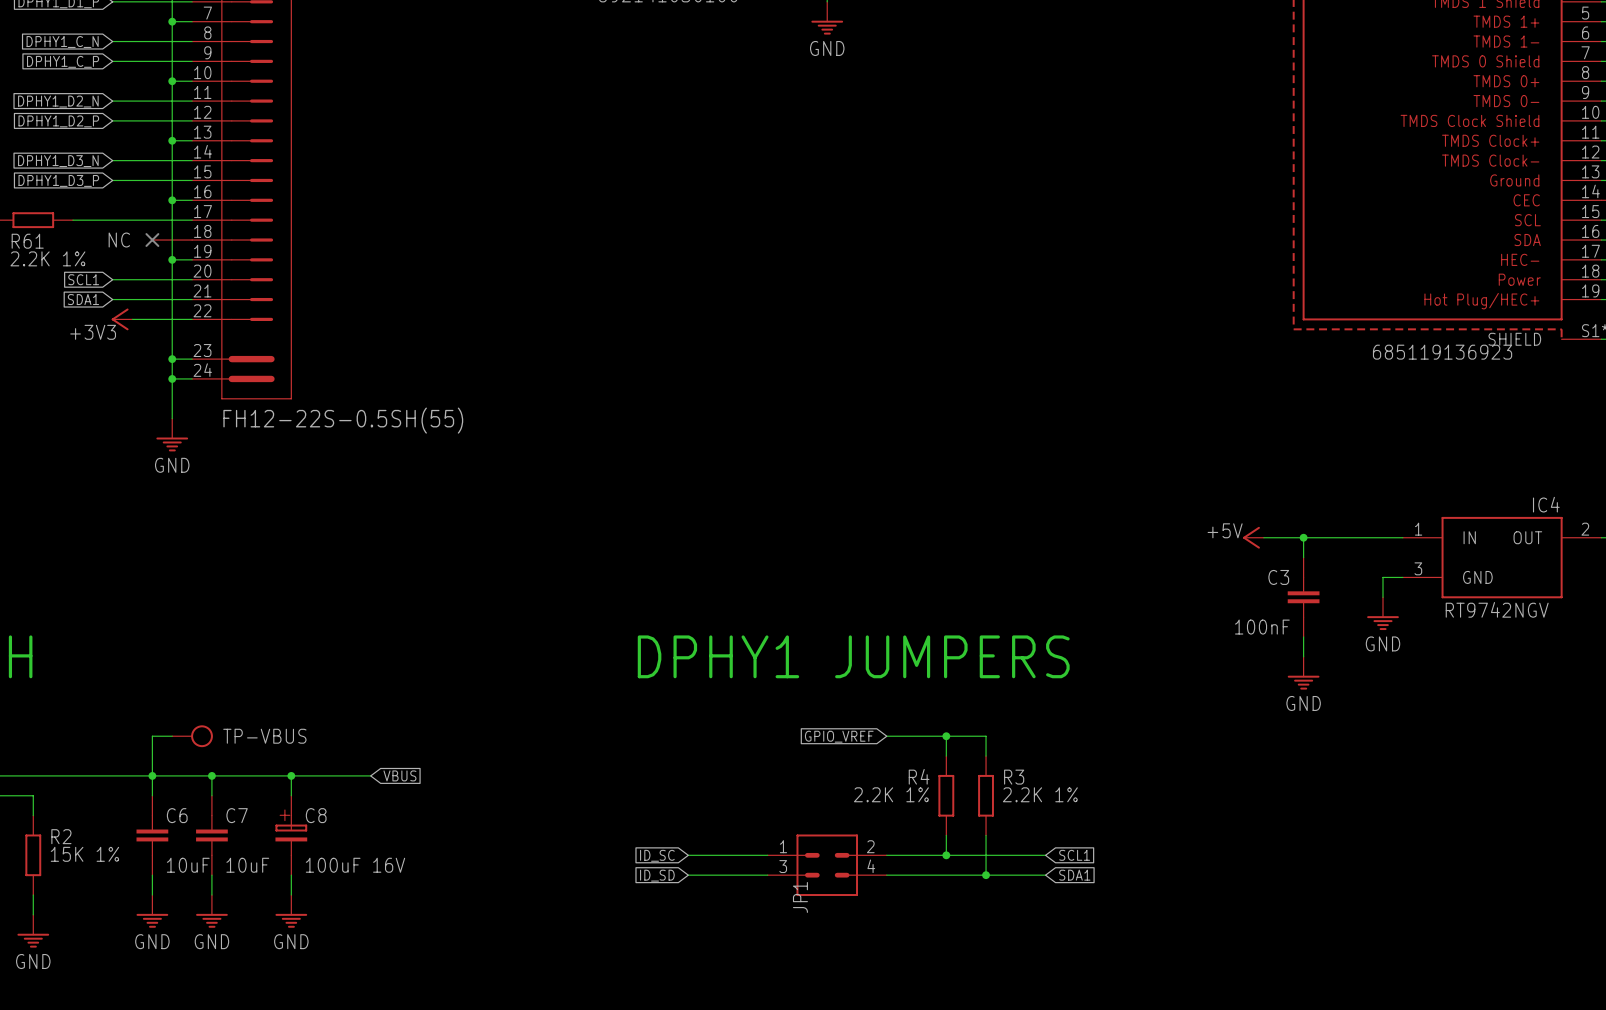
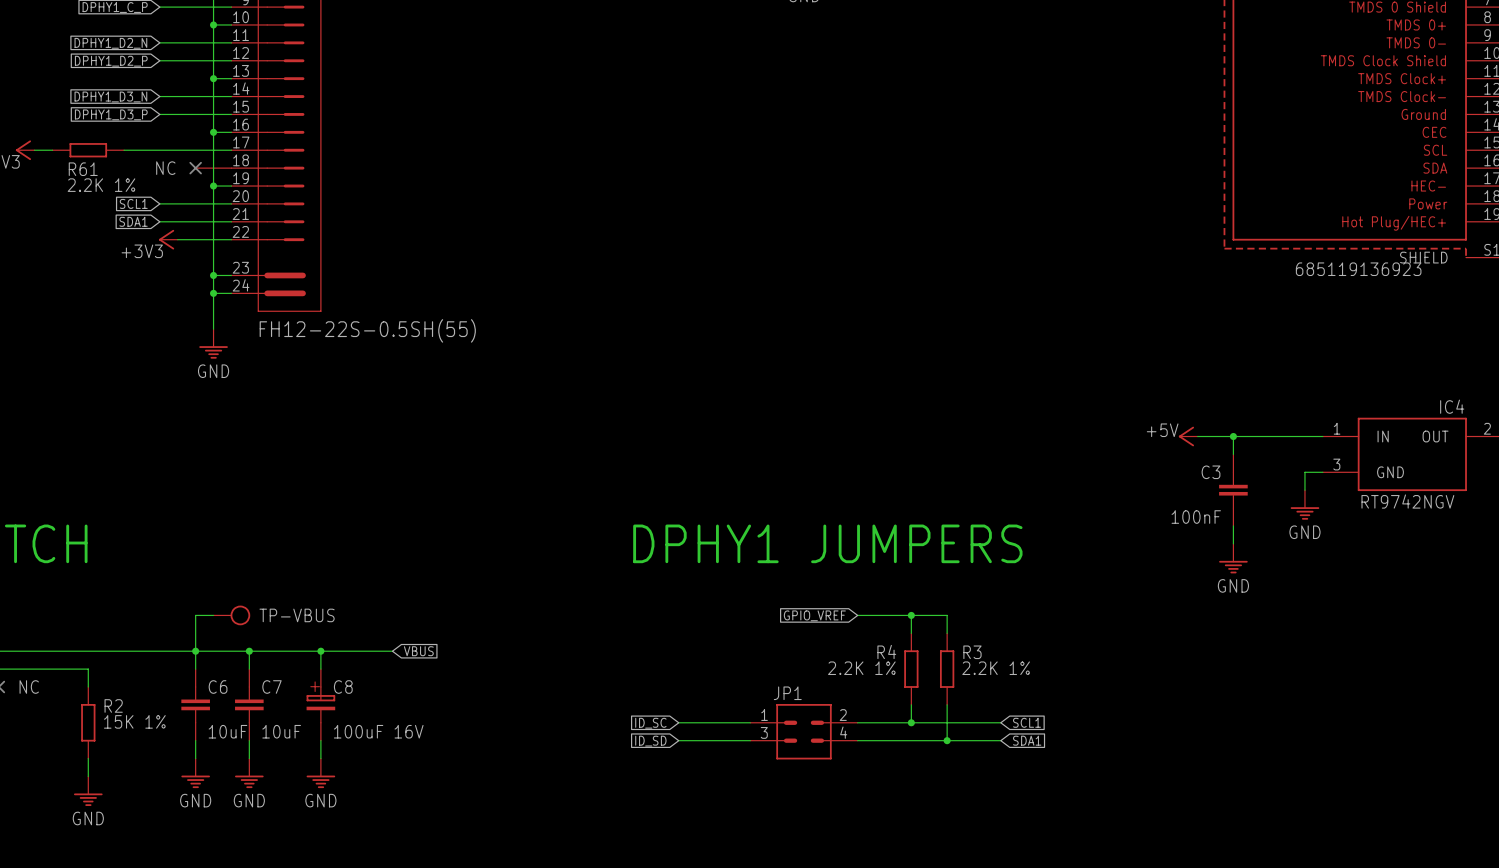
JP1 name rotation: 0° (800, 897) -> 90° clockwise (787, 693)
JP1 name position: JP1 (800, 897) -> JP1 (787, 693)

